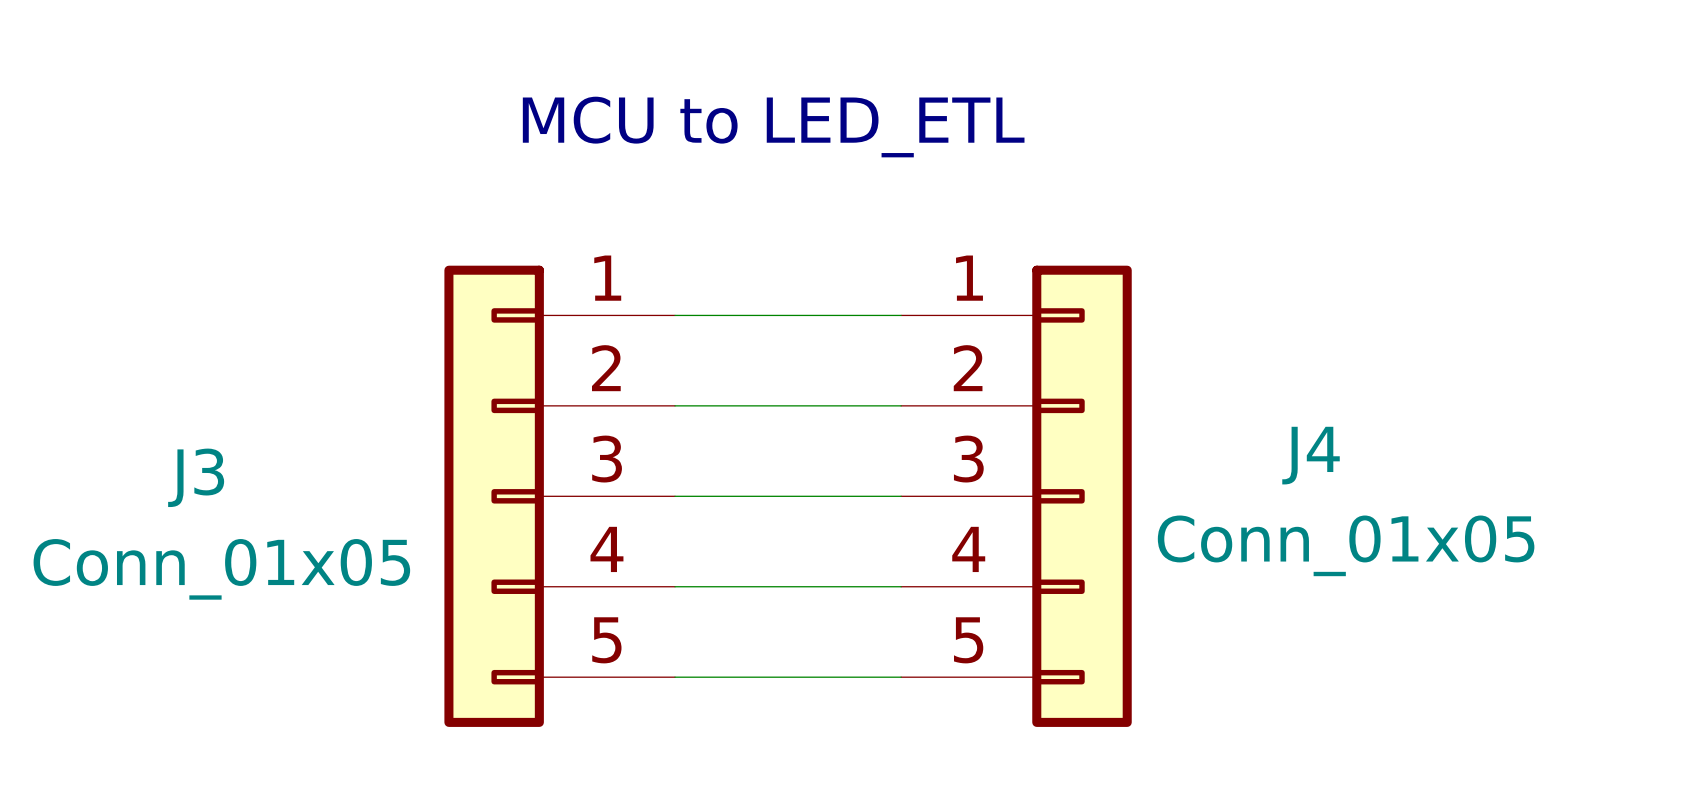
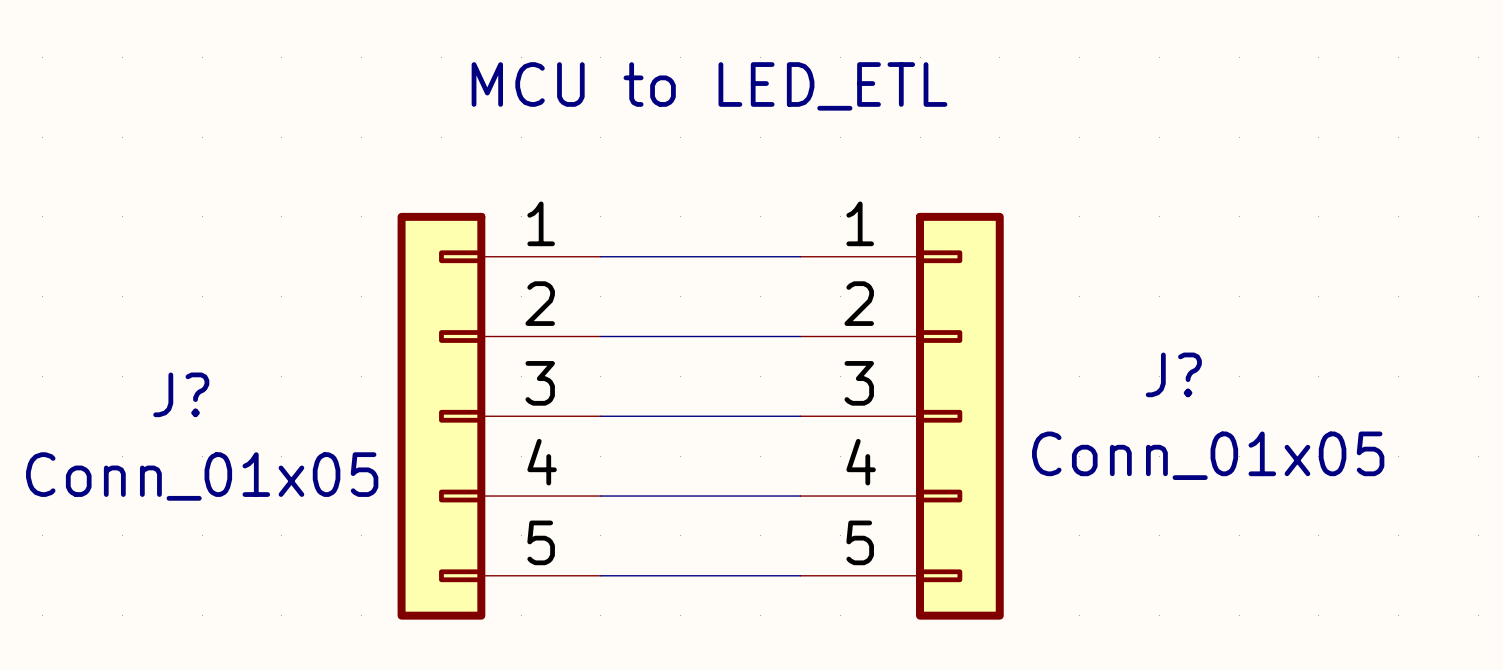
J4 name: J4 (1311, 455) -> J? (1173, 374)
J3 name: J3 (196, 477) -> J? (181, 394)

